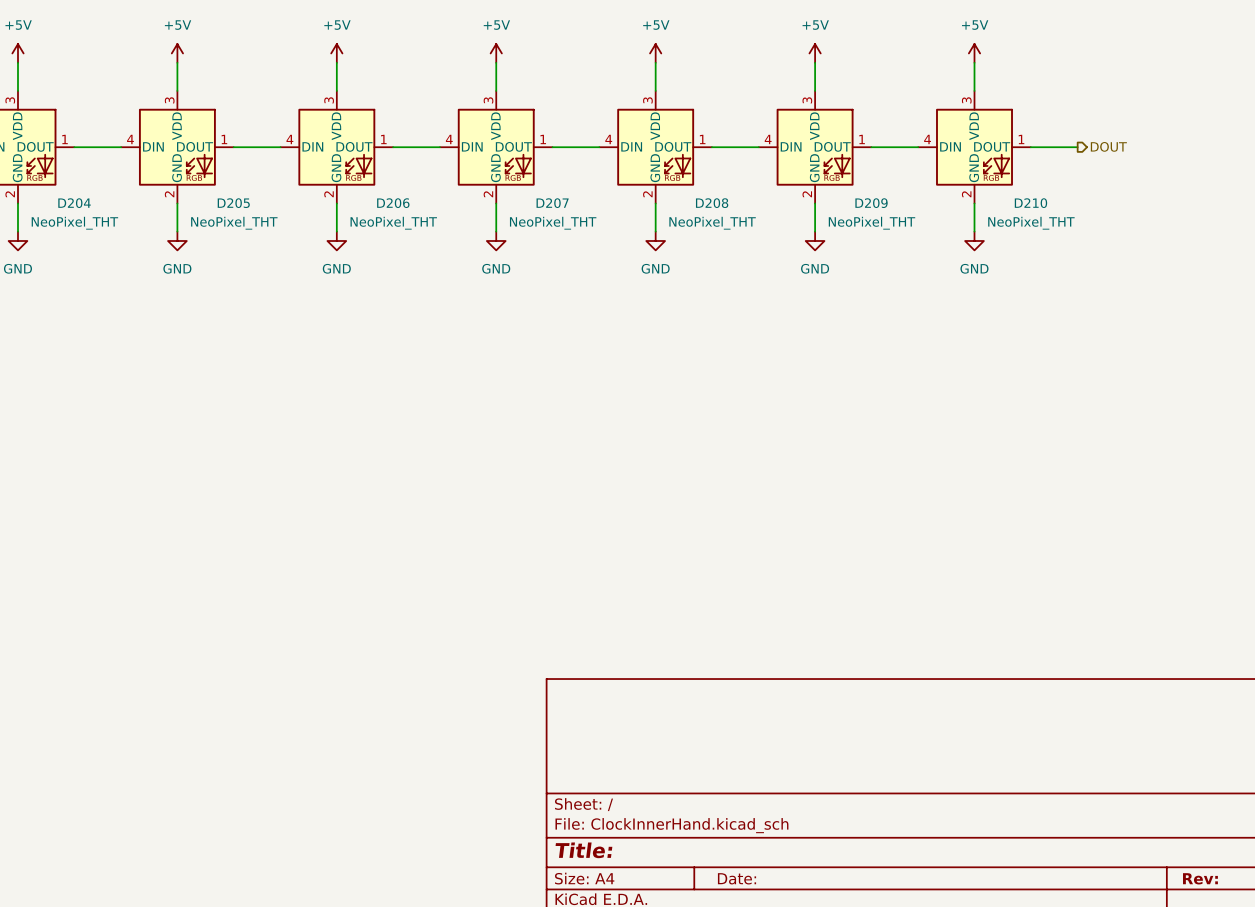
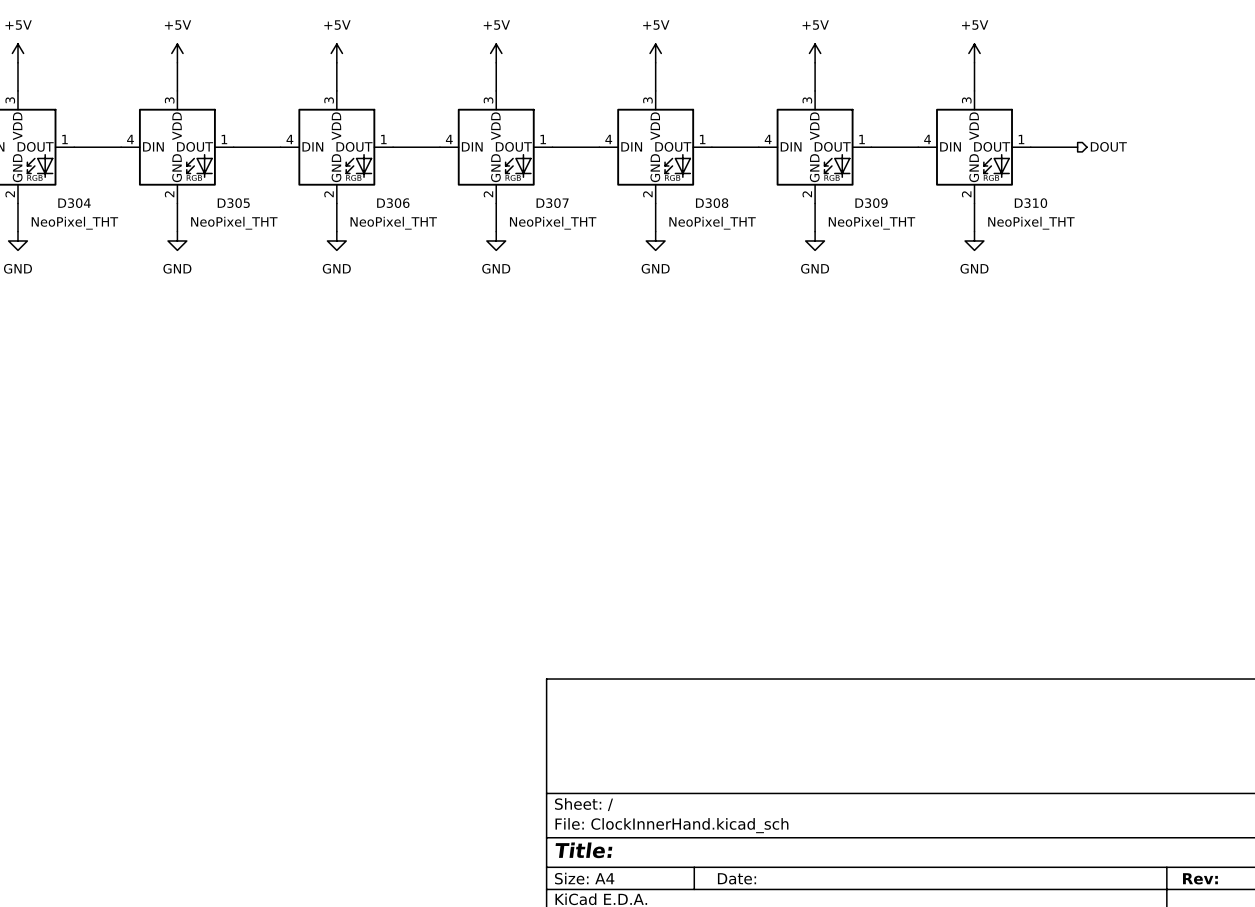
D204 name: D204 (74, 203) -> D304 (74, 203)
D205 name: D205 (233, 203) -> D305 (233, 203)
D206 name: D206 (393, 203) -> D306 (393, 203)
D207 name: D207 (552, 203) -> D307 (552, 203)
D208 name: D208 (712, 203) -> D308 (712, 203)
D209 name: D209 (871, 203) -> D309 (871, 203)
D210 name: D210 (1030, 203) -> D310 (1030, 203)

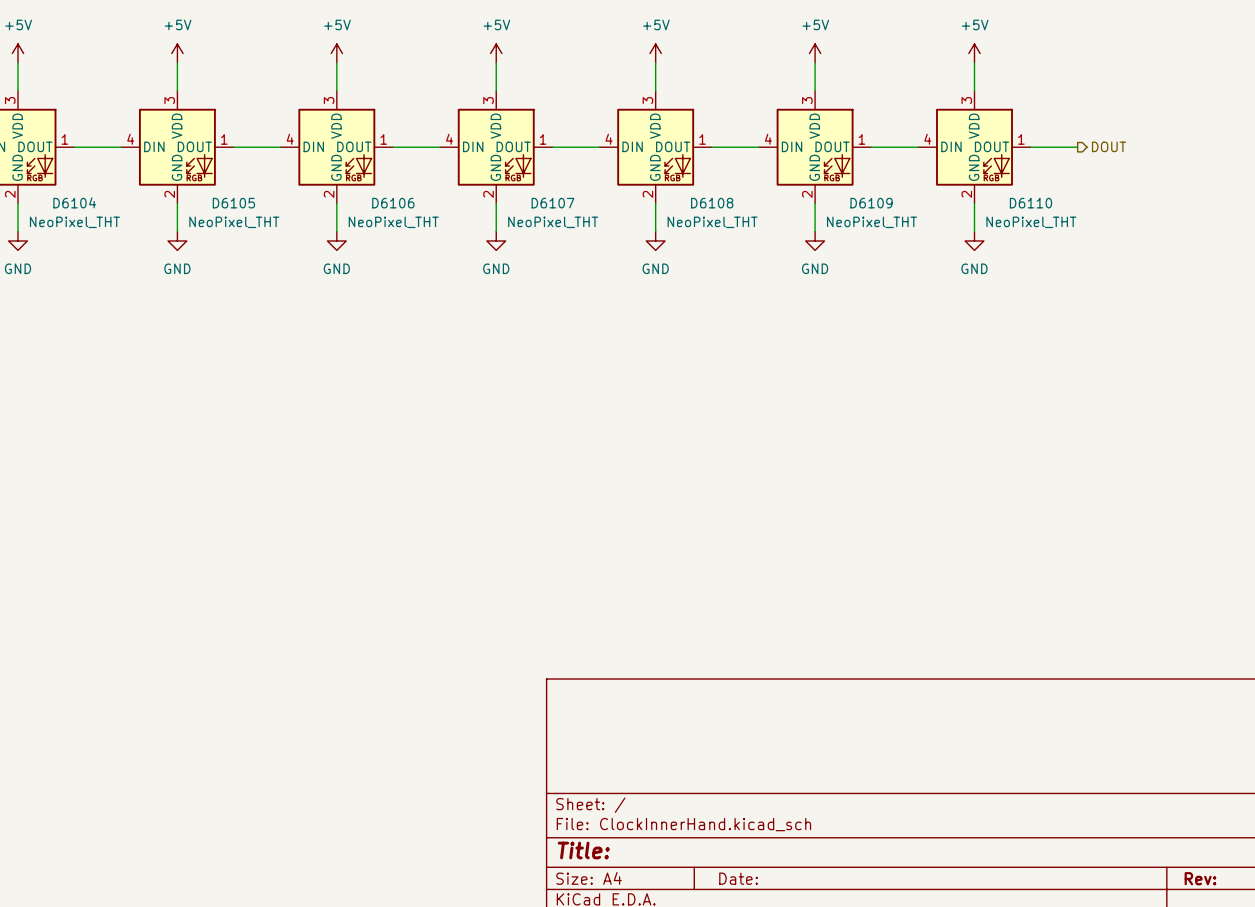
D304 name: D304 (74, 203) -> D6104 (74, 202)
D305 name: D305 (233, 203) -> D6105 (233, 203)
D306 name: D306 (393, 203) -> D6106 (393, 203)
D307 name: D307 (552, 203) -> D6107 (552, 203)
D308 name: D308 (712, 203) -> D6108 (712, 203)
D309 name: D309 (871, 203) -> D6109 (871, 203)
D310 name: D310 (1030, 203) -> D6110 (1030, 203)

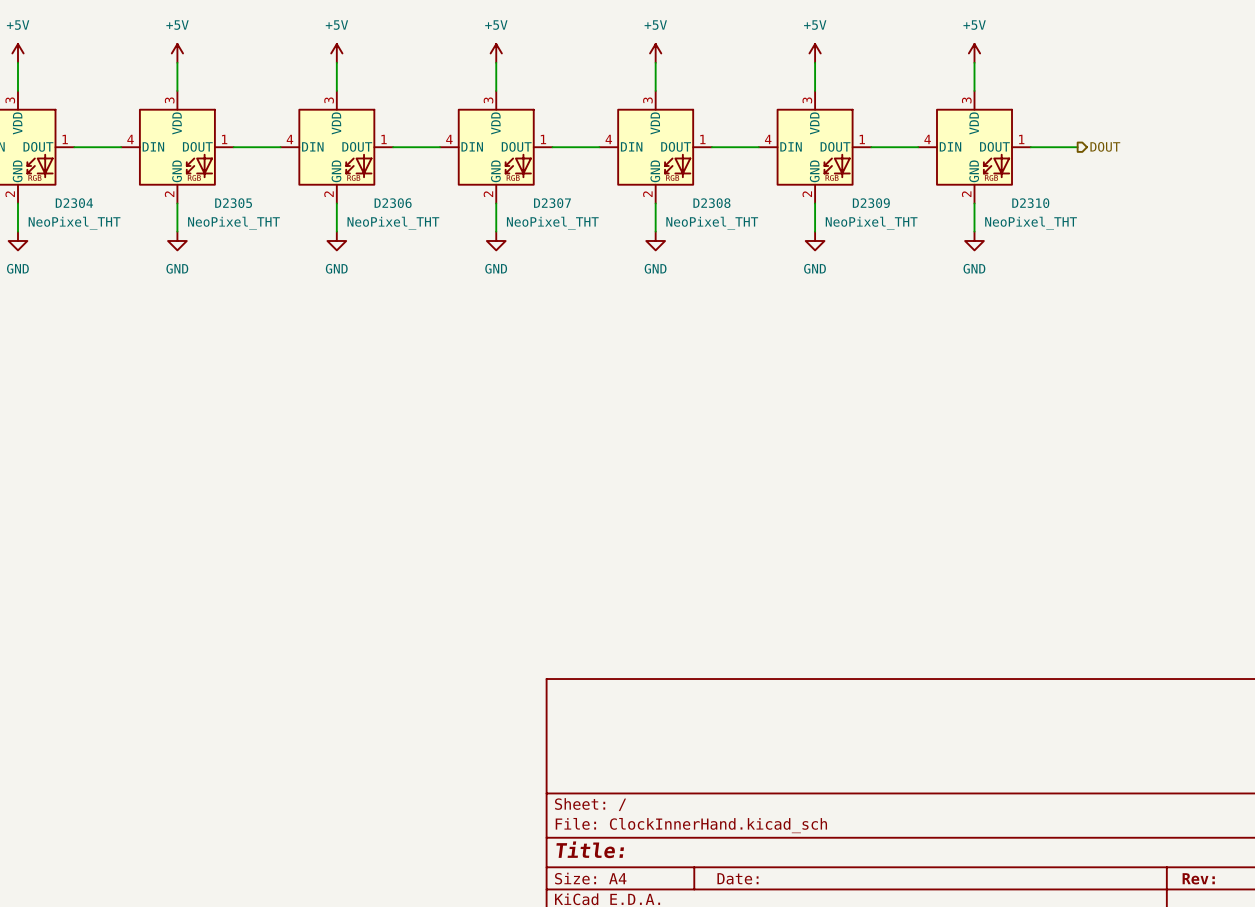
D6104 name: D6104 (74, 202) -> D2304 (74, 203)
D6105 name: D6105 (233, 203) -> D2305 (233, 203)
D6106 name: D6106 (393, 203) -> D2306 (393, 203)
D6107 name: D6107 (552, 203) -> D2307 (552, 203)
D6108 name: D6108 (712, 203) -> D2308 (711, 203)
D6109 name: D6109 (871, 203) -> D2309 (871, 203)
D6110 name: D6110 (1030, 203) -> D2310 (1030, 203)

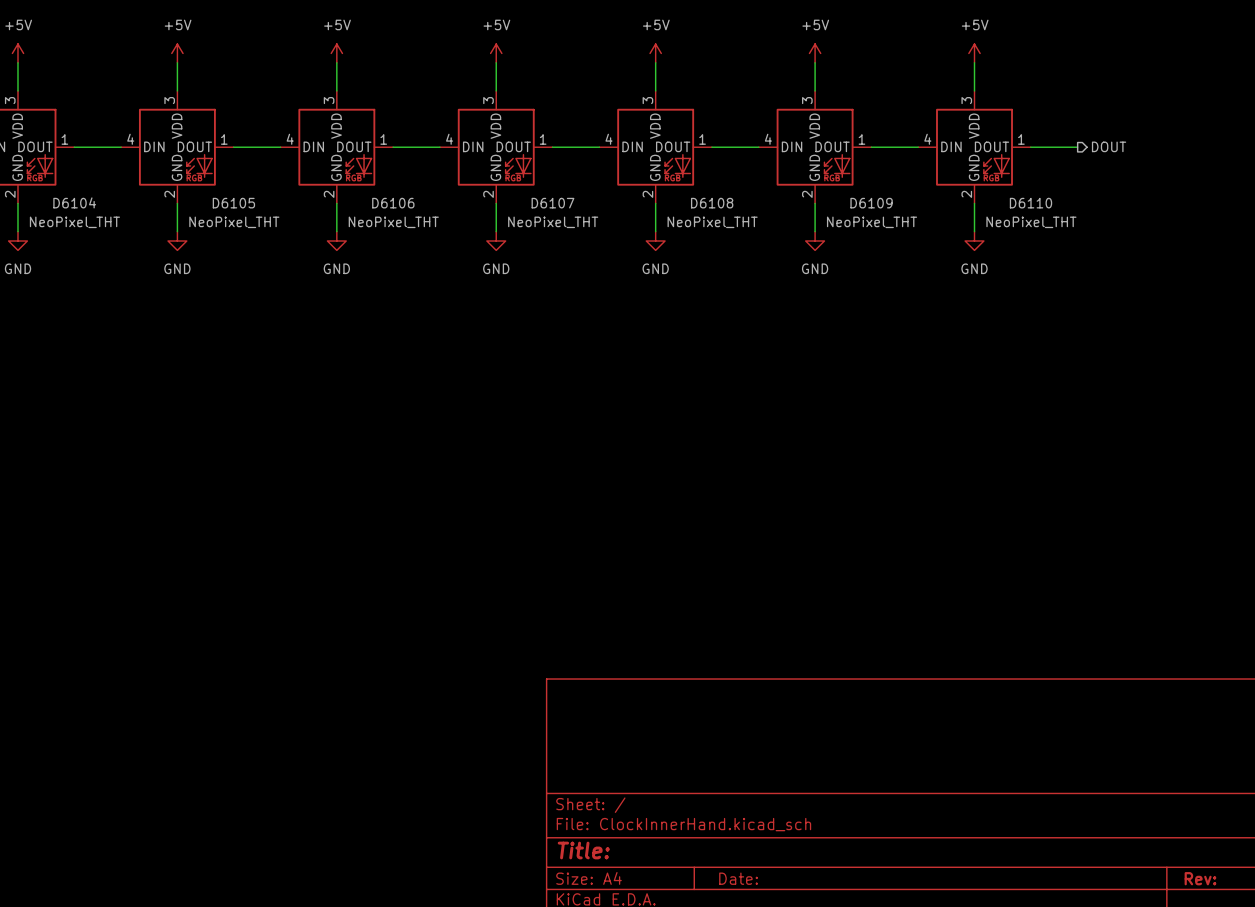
D2304 name: D2304 (74, 203) -> D6104 (74, 202)
D2305 name: D2305 (233, 203) -> D6105 (233, 203)
D2306 name: D2306 (393, 203) -> D6106 (393, 203)
D2307 name: D2307 (552, 203) -> D6107 (552, 203)
D2308 name: D2308 (711, 203) -> D6108 (712, 203)
D2309 name: D2309 (871, 203) -> D6109 (871, 203)
D2310 name: D2310 (1030, 203) -> D6110 (1030, 203)

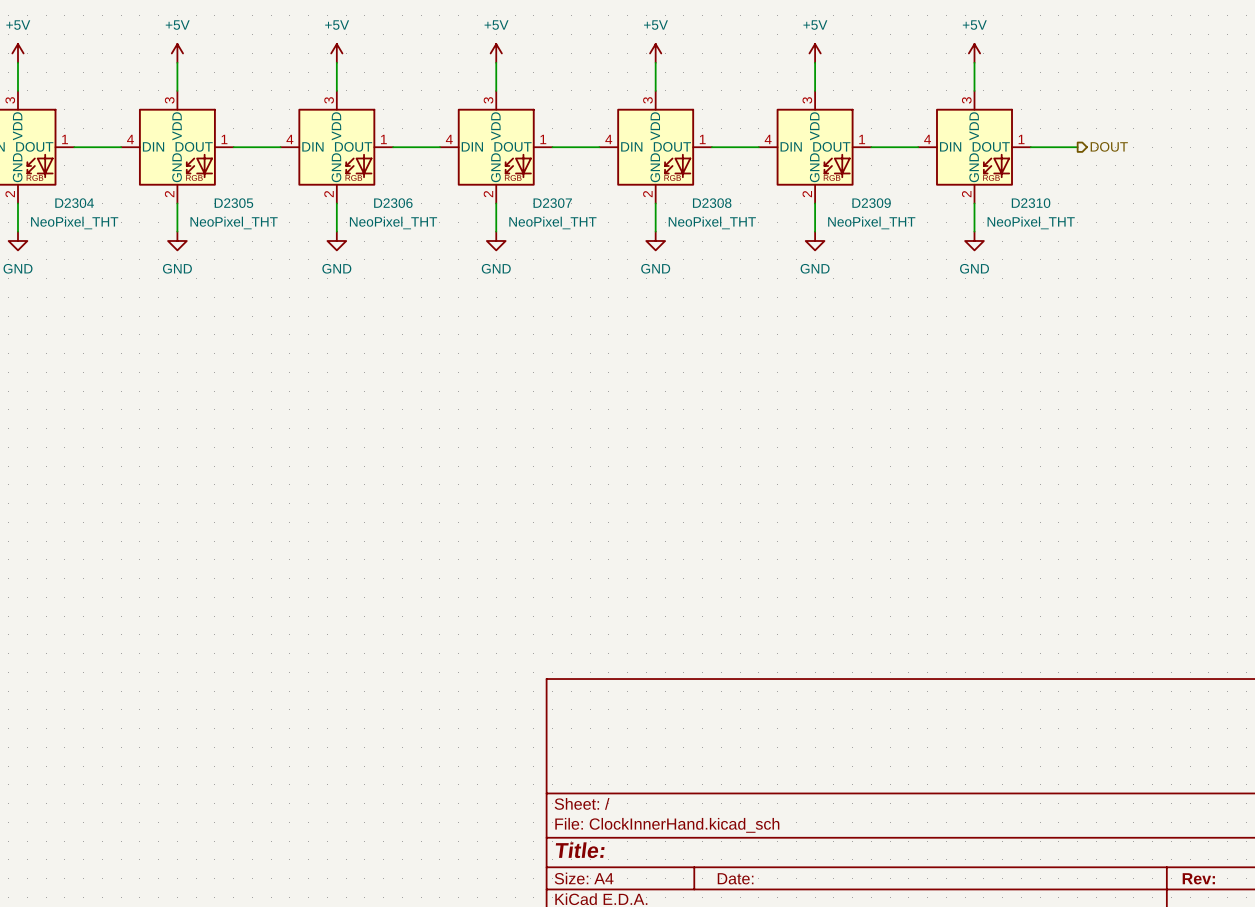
D6104 name: D6104 (74, 202) -> D2304 (74, 203)
D6105 name: D6105 (233, 203) -> D2305 (233, 203)
D6106 name: D6106 (393, 203) -> D2306 (393, 203)
D6107 name: D6107 (552, 203) -> D2307 (552, 203)
D6108 name: D6108 (712, 203) -> D2308 (712, 203)
D6109 name: D6109 (871, 203) -> D2309 (871, 203)
D6110 name: D6110 (1030, 203) -> D2310 (1031, 203)

